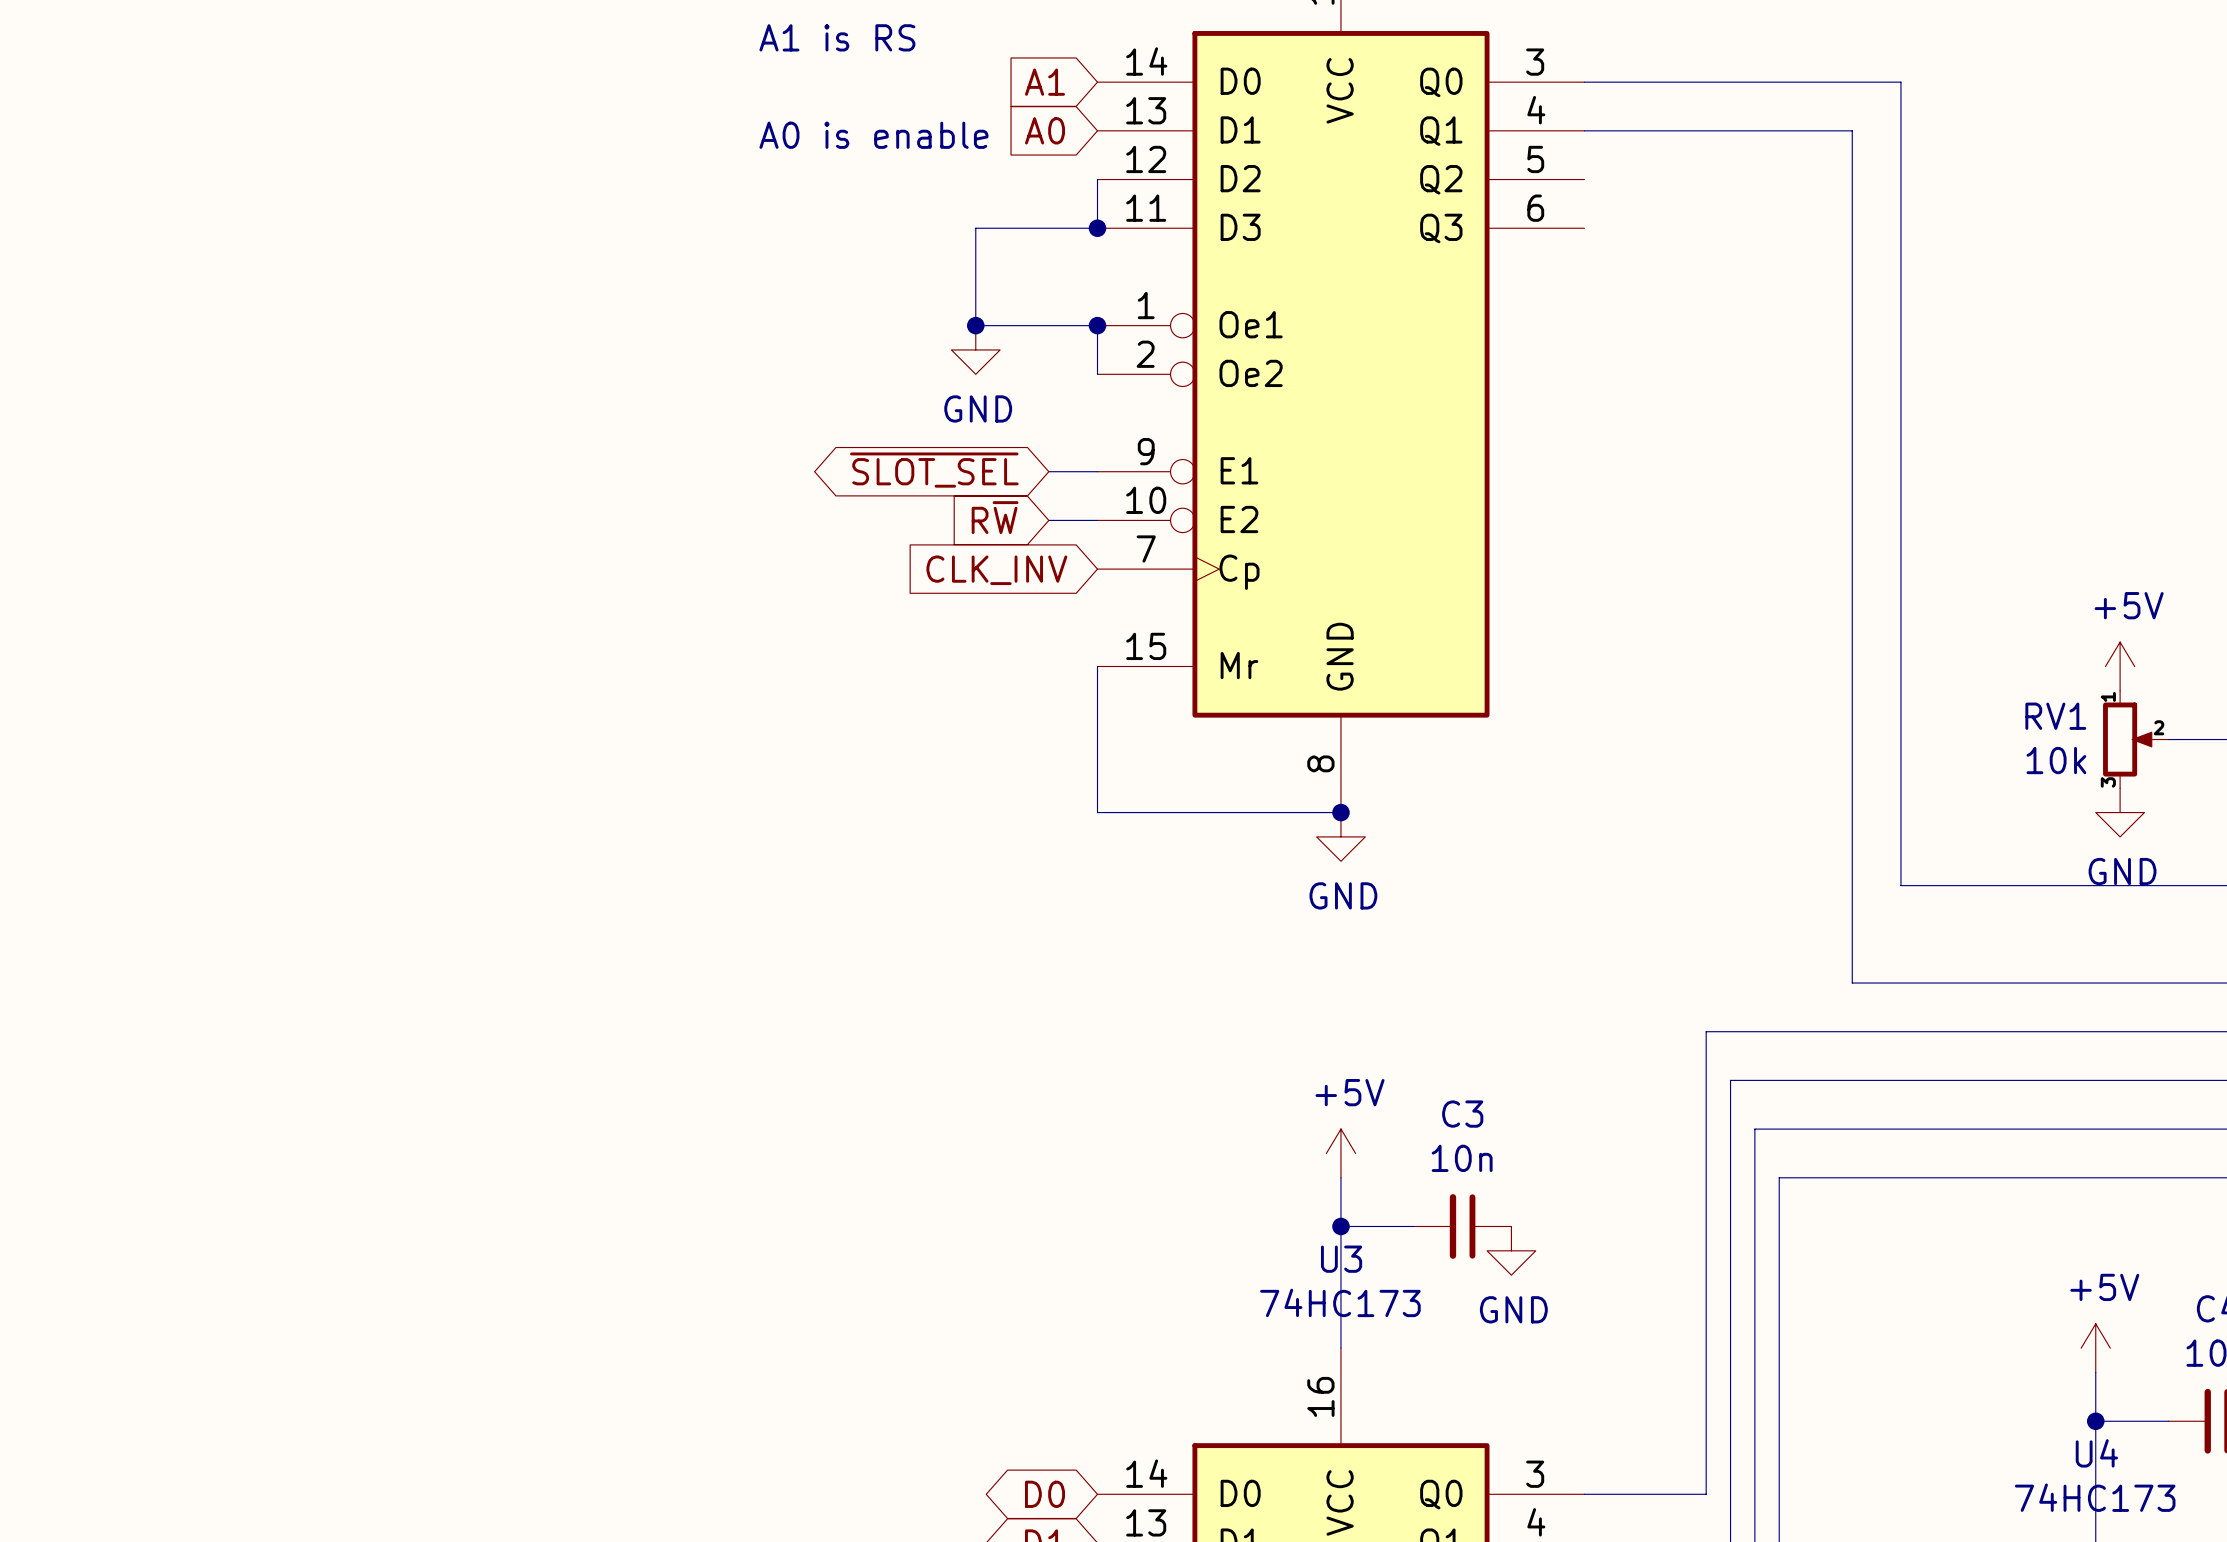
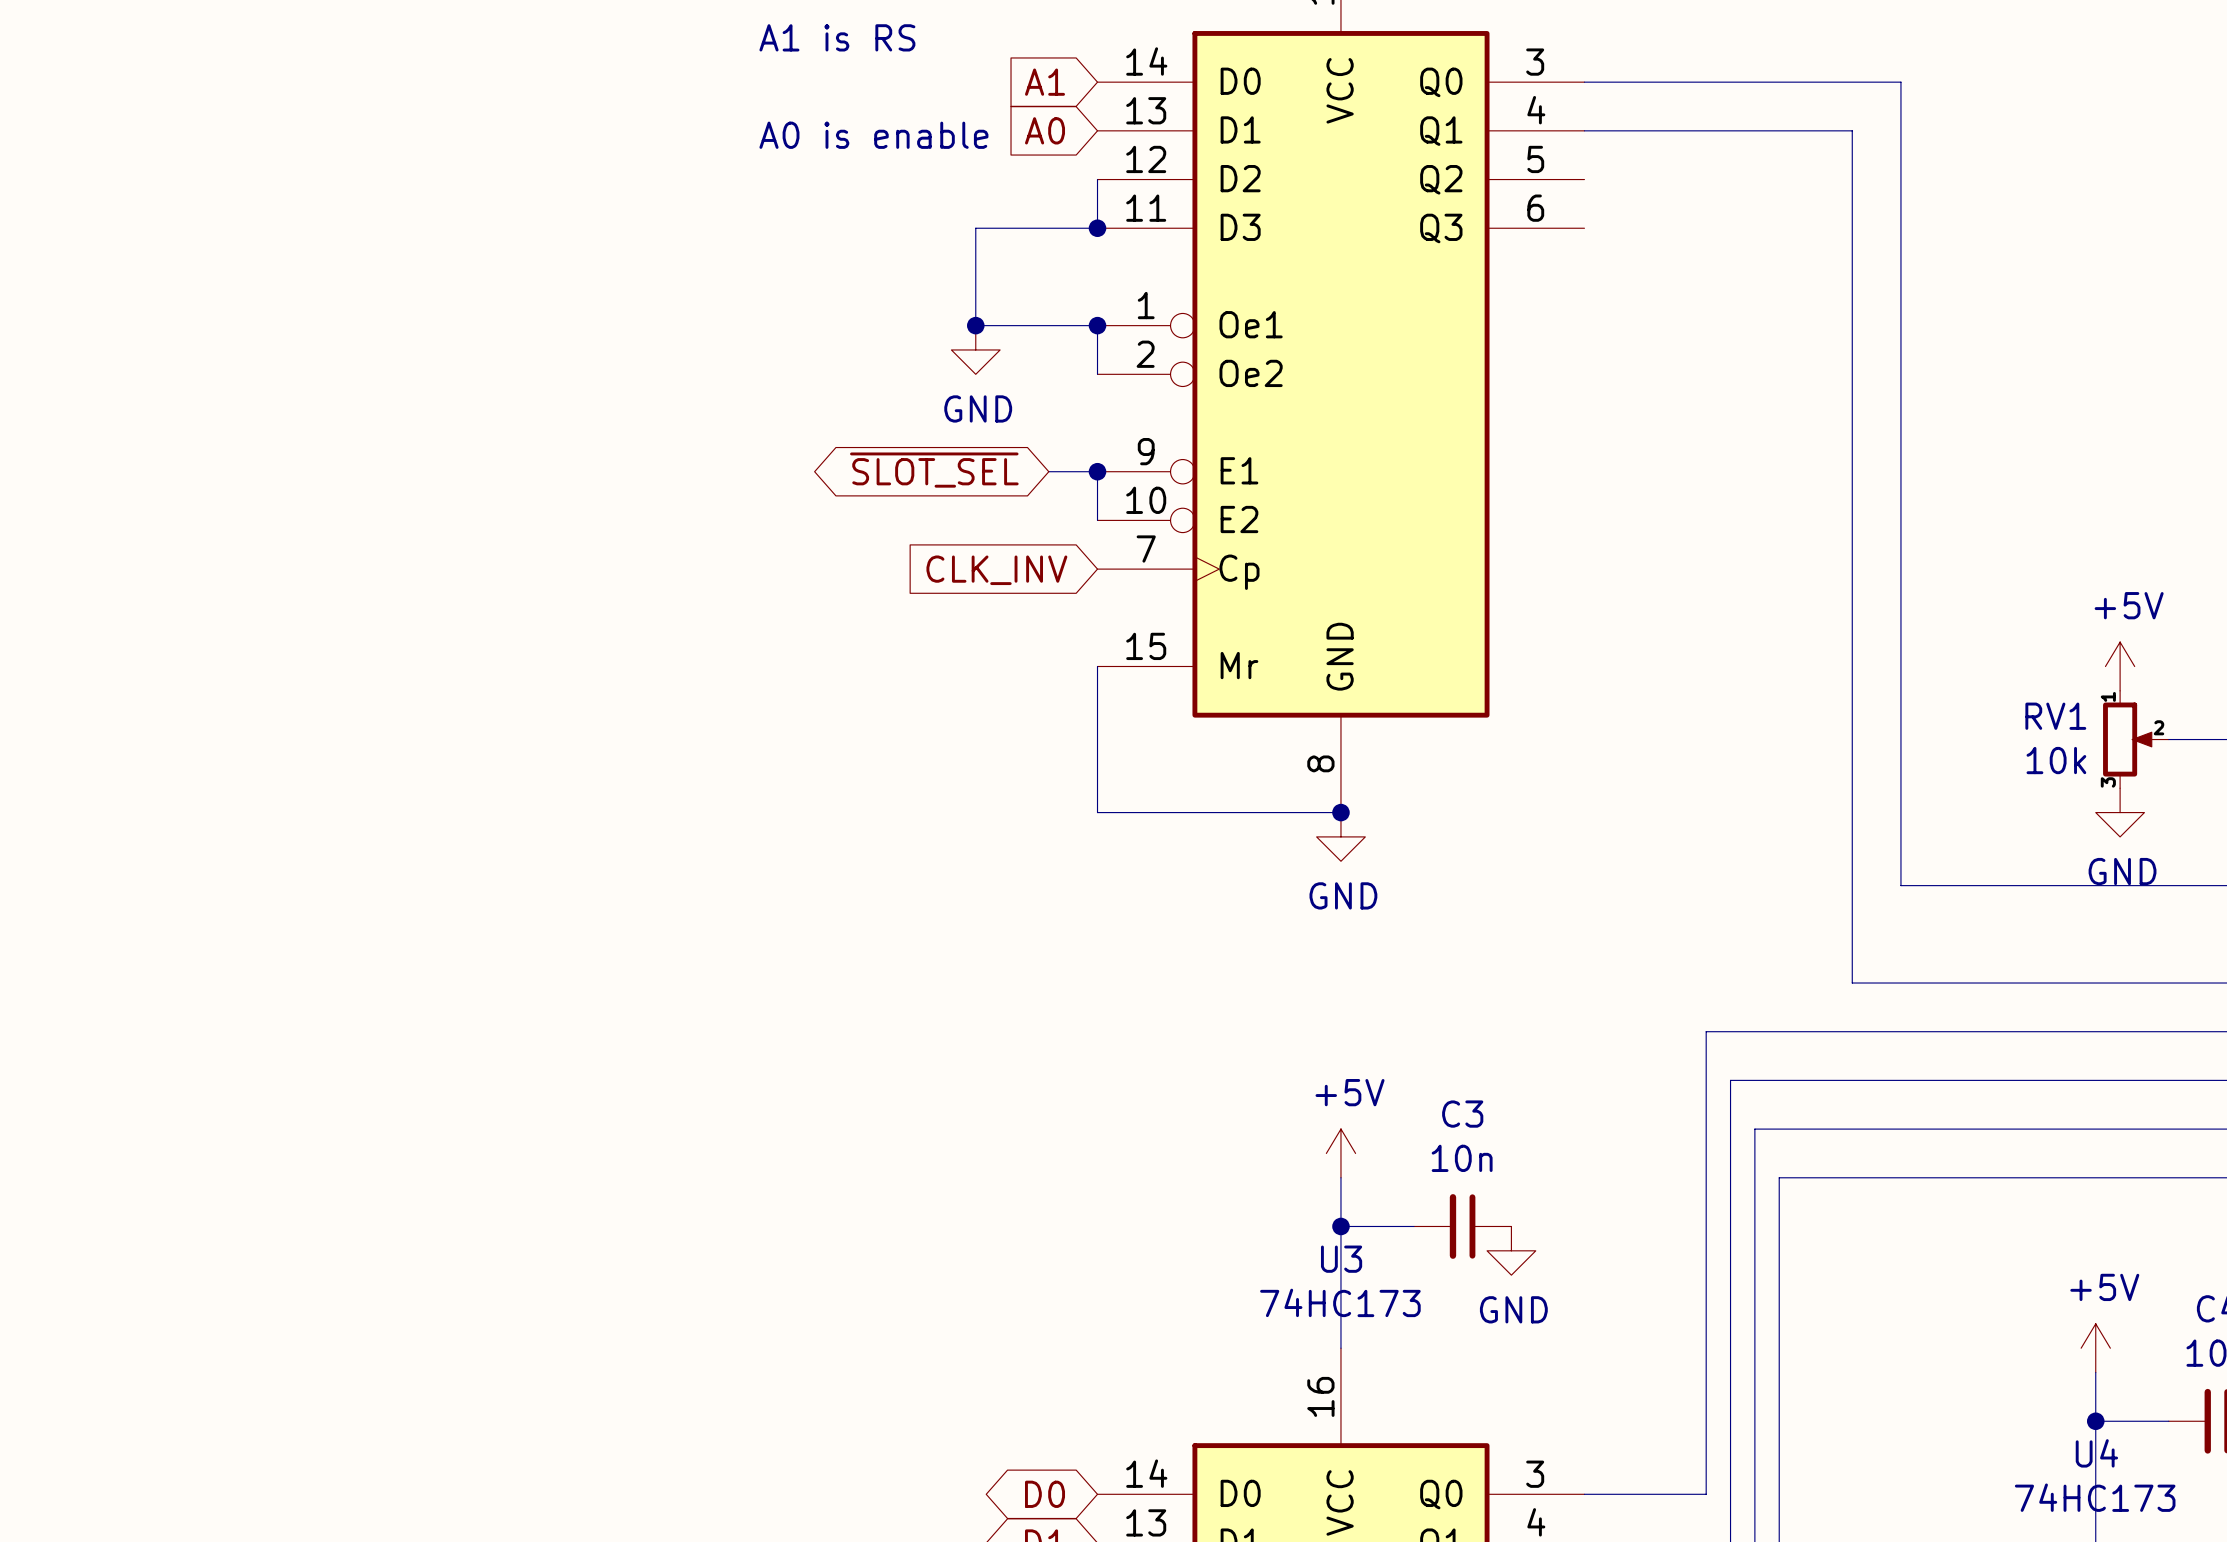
junction: none -> (1097, 471)
global label: R~{W} (995, 517) -> none
wire: (1048, 520) (1097, 520) -> (1097, 471) (1097, 520)

